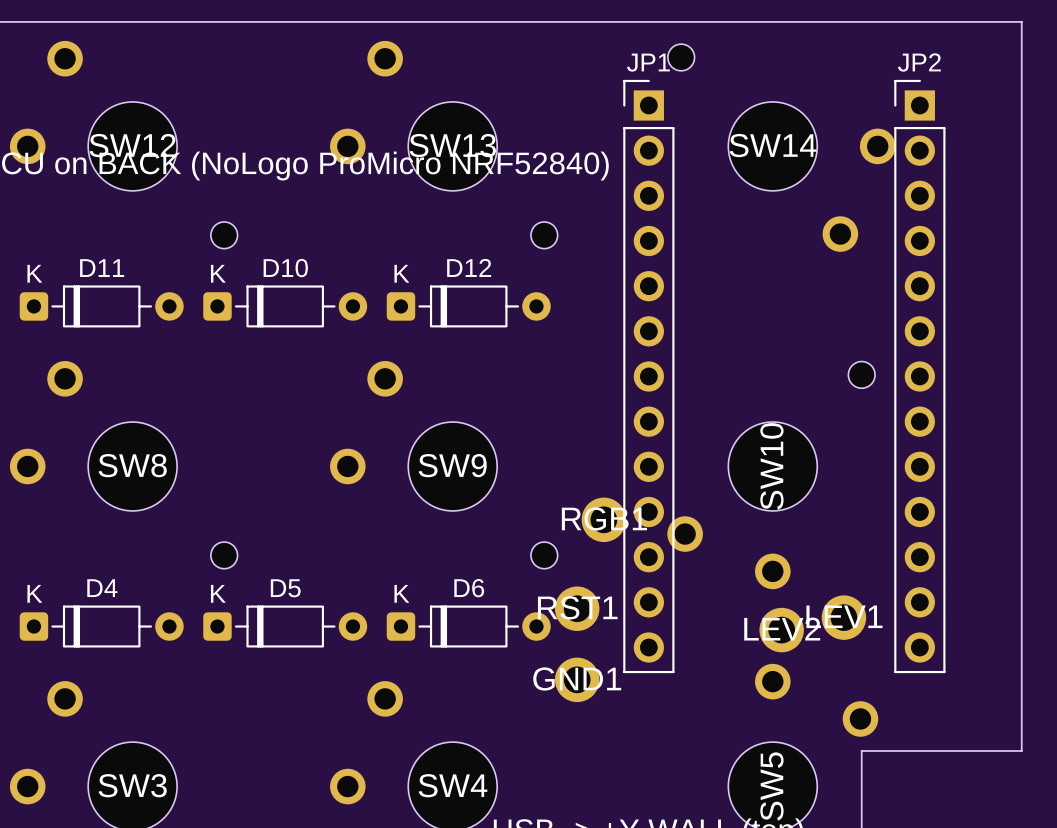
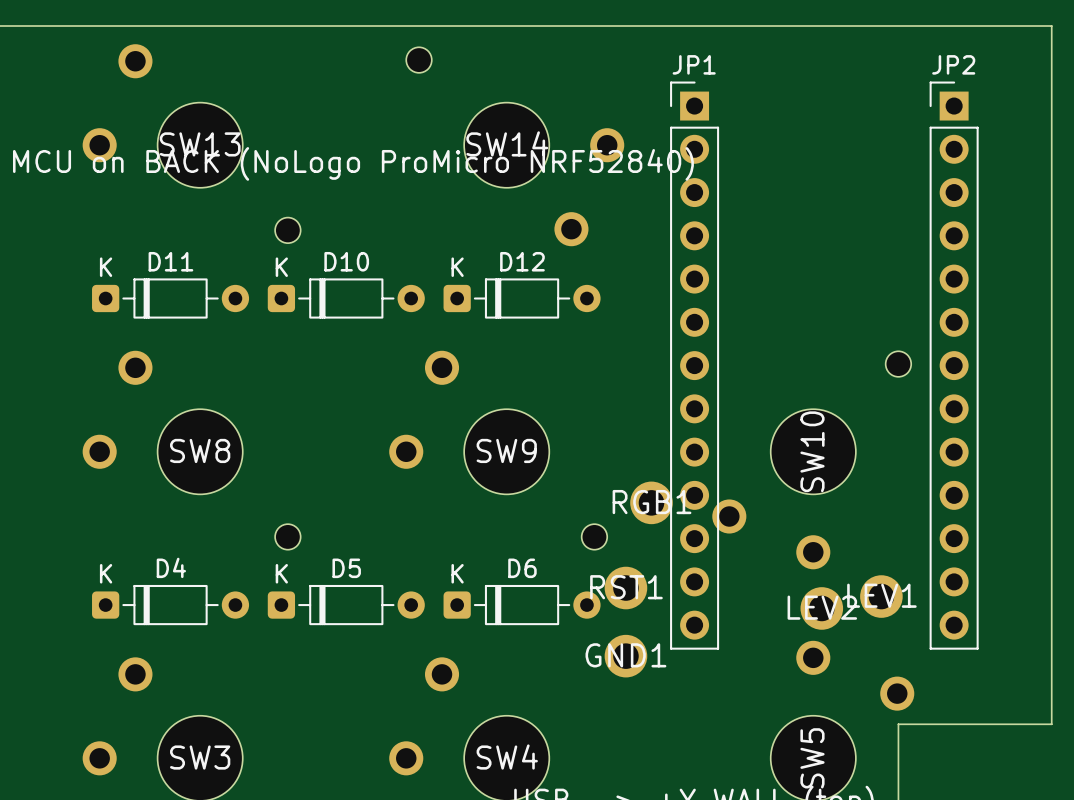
SW13: (443, 144) -> none
SW12 name: SW12 (132, 145) -> SW13 (200, 144)
SW14 position: (781, 147) -> (515, 146)

